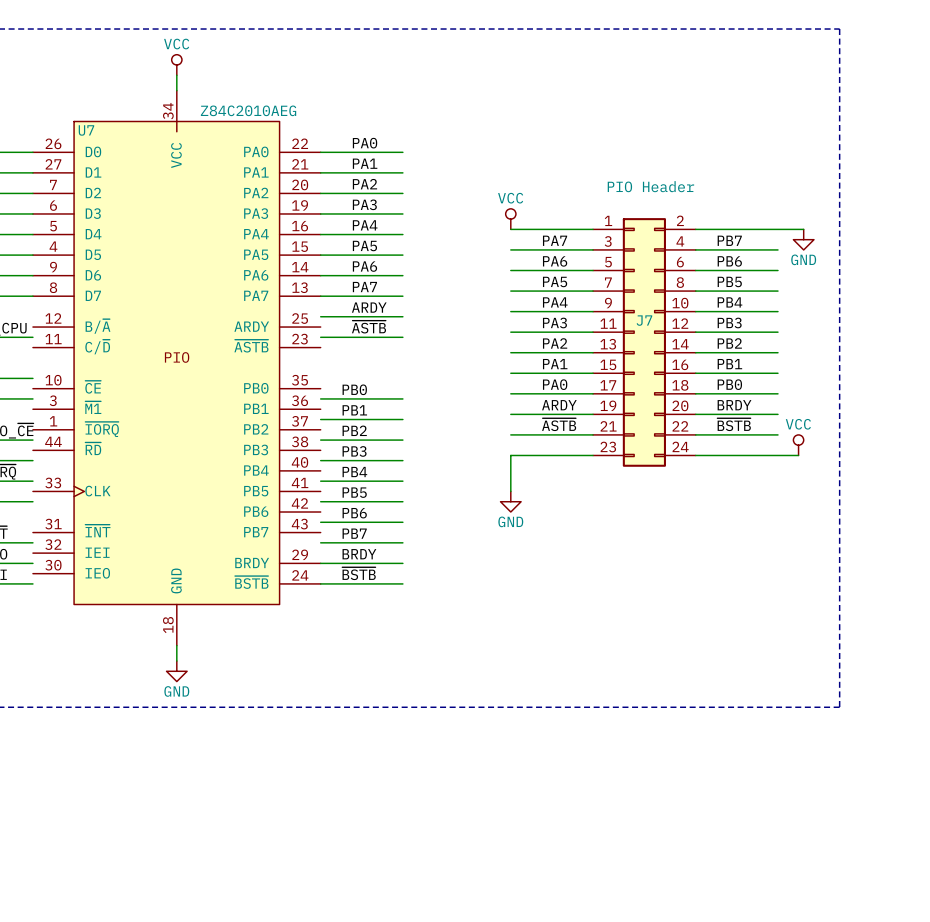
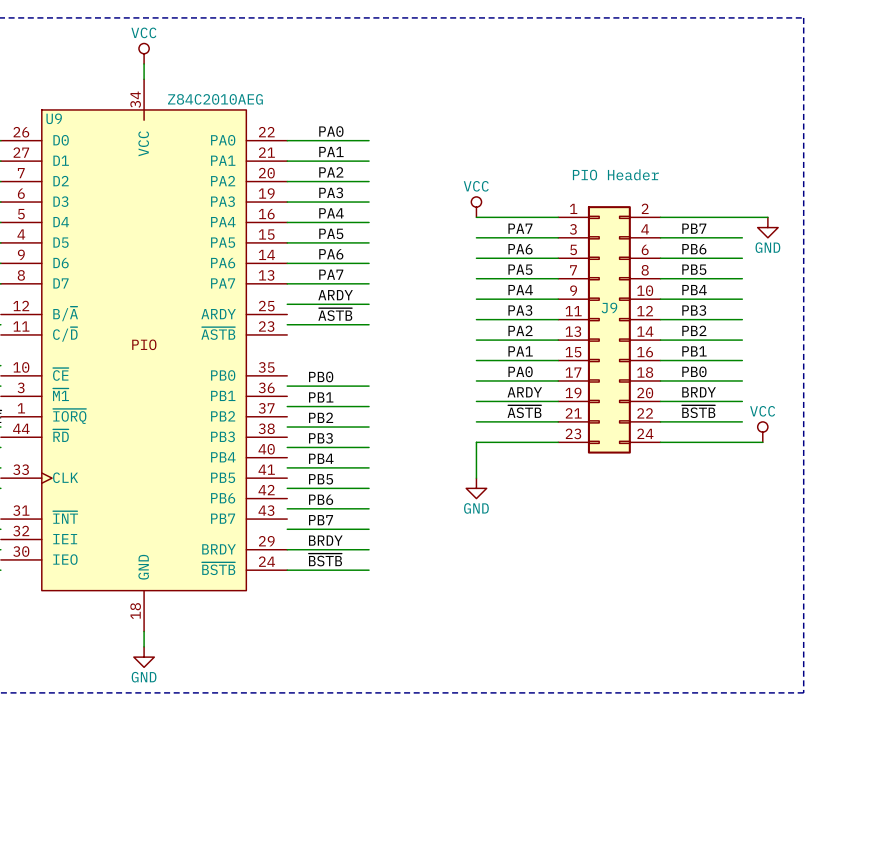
U7 name: U7 (86, 130) -> U9 (54, 118)
J7 name: J7 (644, 320) -> J9 (609, 307)

